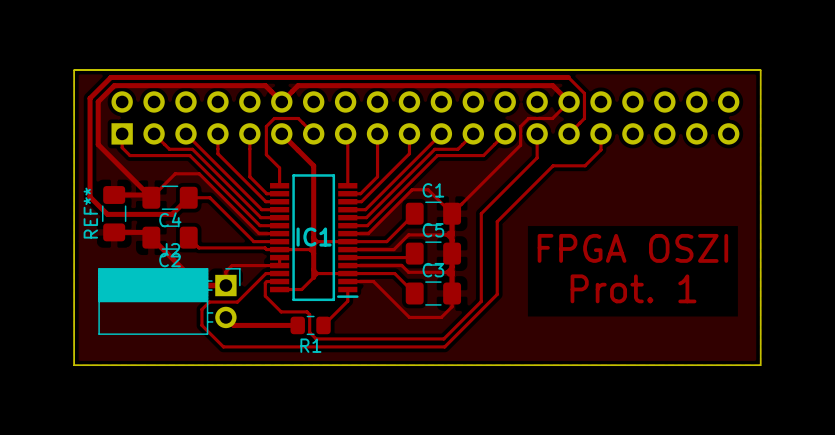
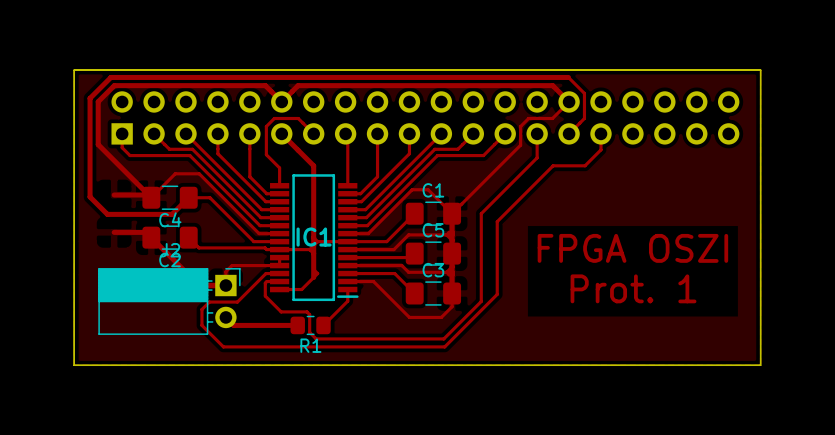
REF**: (114, 213) -> none
top track: (317, 273) (347, 273) -> none

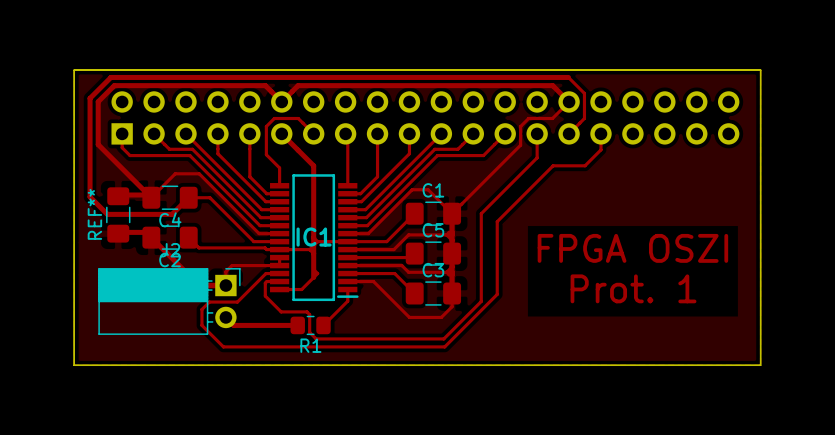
REF**: none -> (118, 214)

